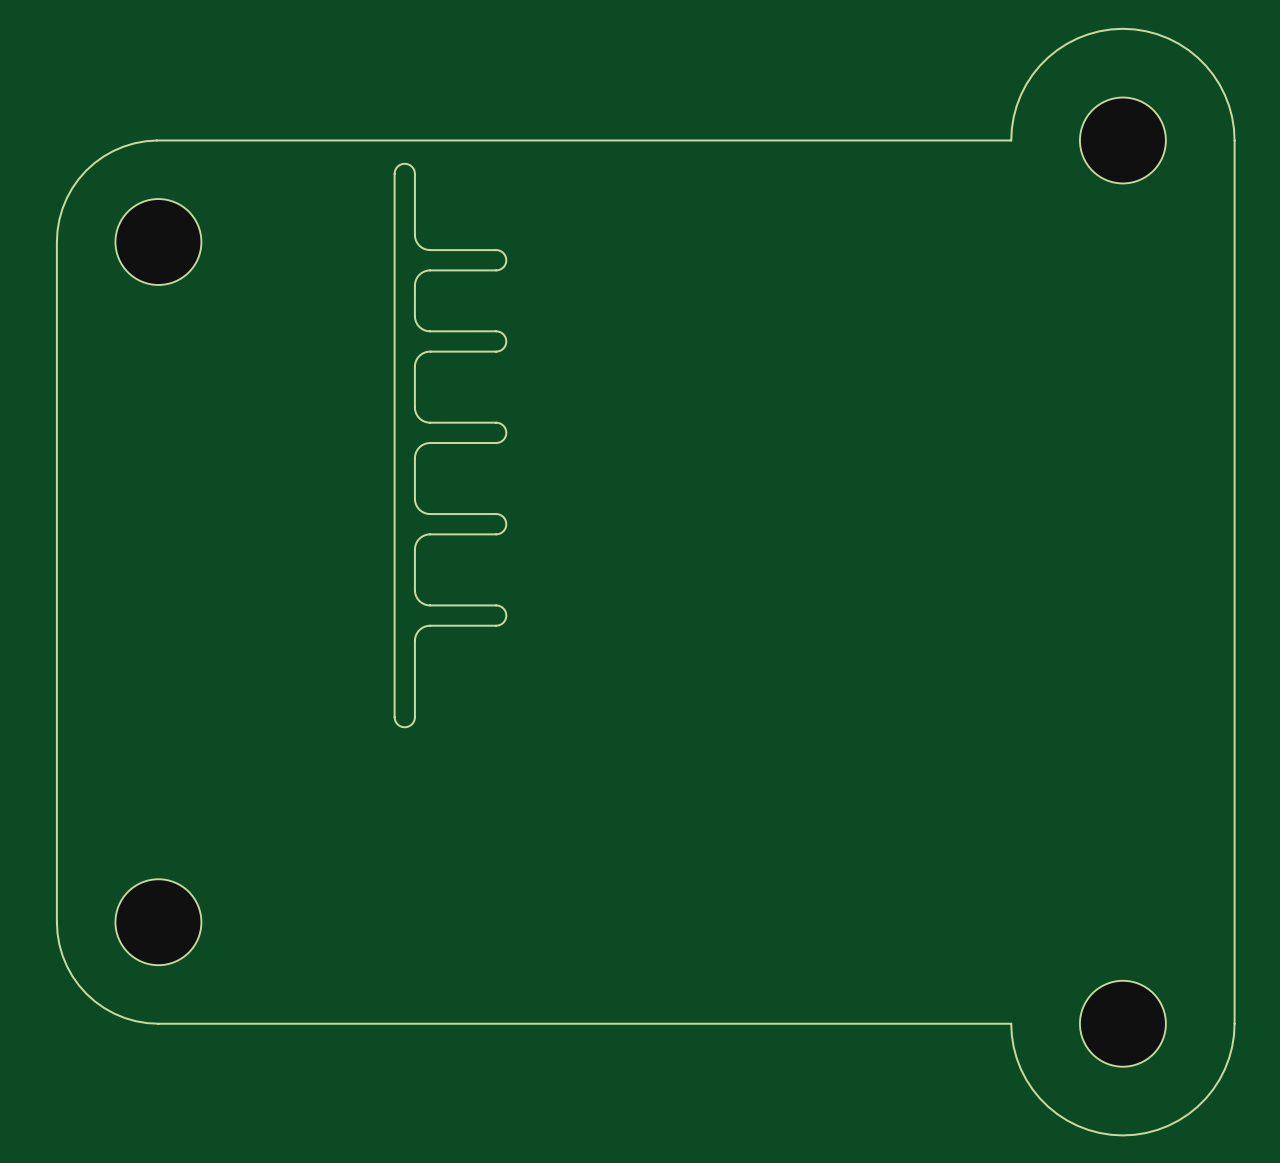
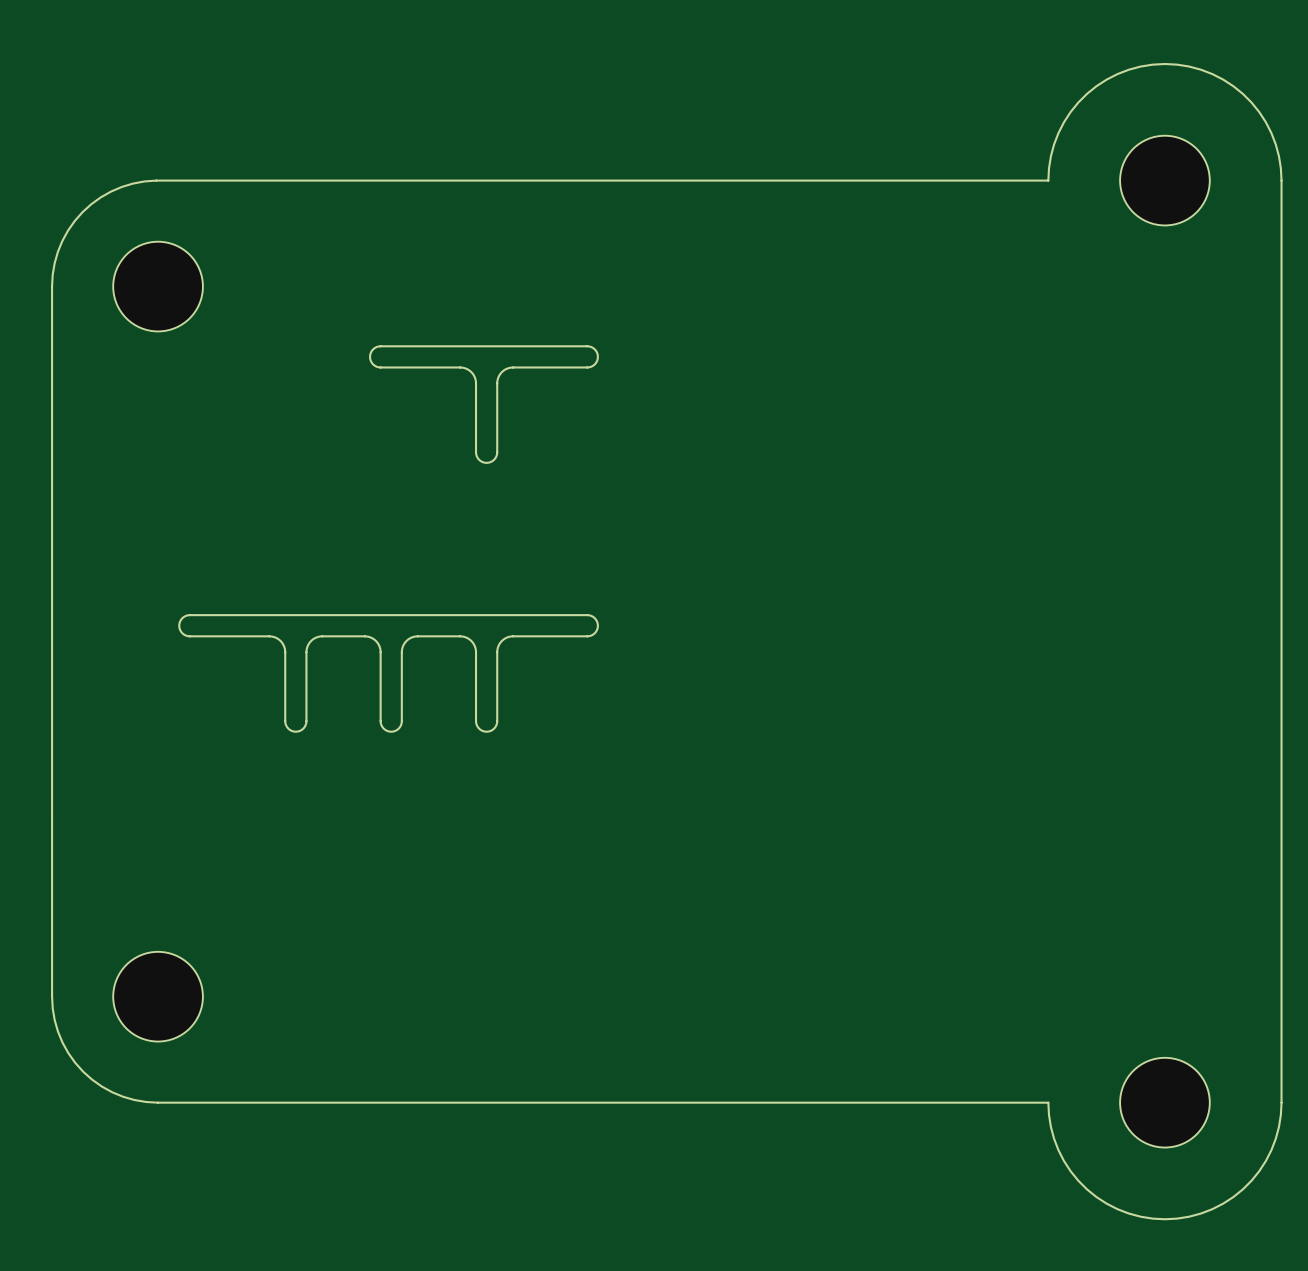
board edge: (414, 173) (414, 234) (419, 245) (430, 250) (497, 250) (504, 254) (506, 260) (504, 266) (497, 270) (426, 270) (419, 274) (415, 281) (415, 318) (418, 325) (422, 329) (430, 331) (497, 331) (504, 335) (506, 341) (504, 347) (498, 351) (429, 351) (420, 354) (416, 360) (415, 409) (420, 419) (430, 422) (497, 422) (504, 426) (506, 432) (504, 439) (497, 442) (430, 442) (420, 446) (415, 456) (416, 504) (420, 510) (428, 513) (498, 514) (503, 517) (506, 524) (503, 530) (497, 534) (430, 534) (420, 537) (415, 547) (415, 594) (419, 600) (426, 604) (497, 605) (503, 608) (506, 615) (503, 622) (497, 625) (430, 625) (419, 630) (414, 640) (414, 718) (411, 724) (404, 727) (397, 723) (394, 717) (394, 173) (397, 166) (404, 163) (411, 166) (414, 173) -> none
board edge: none -> (587, 346) (380, 346) (373, 348) (370, 356) (372, 363) (379, 367) (460, 367) (471, 372) (476, 383) (476, 453) (480, 460) (486, 462) (493, 460) (497, 453) (497, 383) (500, 373) (511, 367) (590, 367) (595, 363) (597, 355) (594, 349) (587, 346)
board edge: none -> (587, 615) (189, 615) (182, 618) (179, 625) (181, 632) (188, 636) (269, 636) (280, 640) (285, 652) (285, 722) (289, 729) (295, 731) (302, 729) (306, 722) (306, 650) (308, 644) (314, 638) (322, 636) (364, 636) (370, 637) (377, 642) (380, 652) (380, 722) (384, 729) (391, 731) (397, 729) (401, 722) (401, 652) (405, 642) (415, 636) (466, 637) (472, 642) (475, 650) (476, 723) (479, 729) (486, 731) (493, 729) (497, 722) (497, 652) (500, 642) (511, 636) (590, 635) (596, 631) (597, 624) (594, 618) (587, 615)

